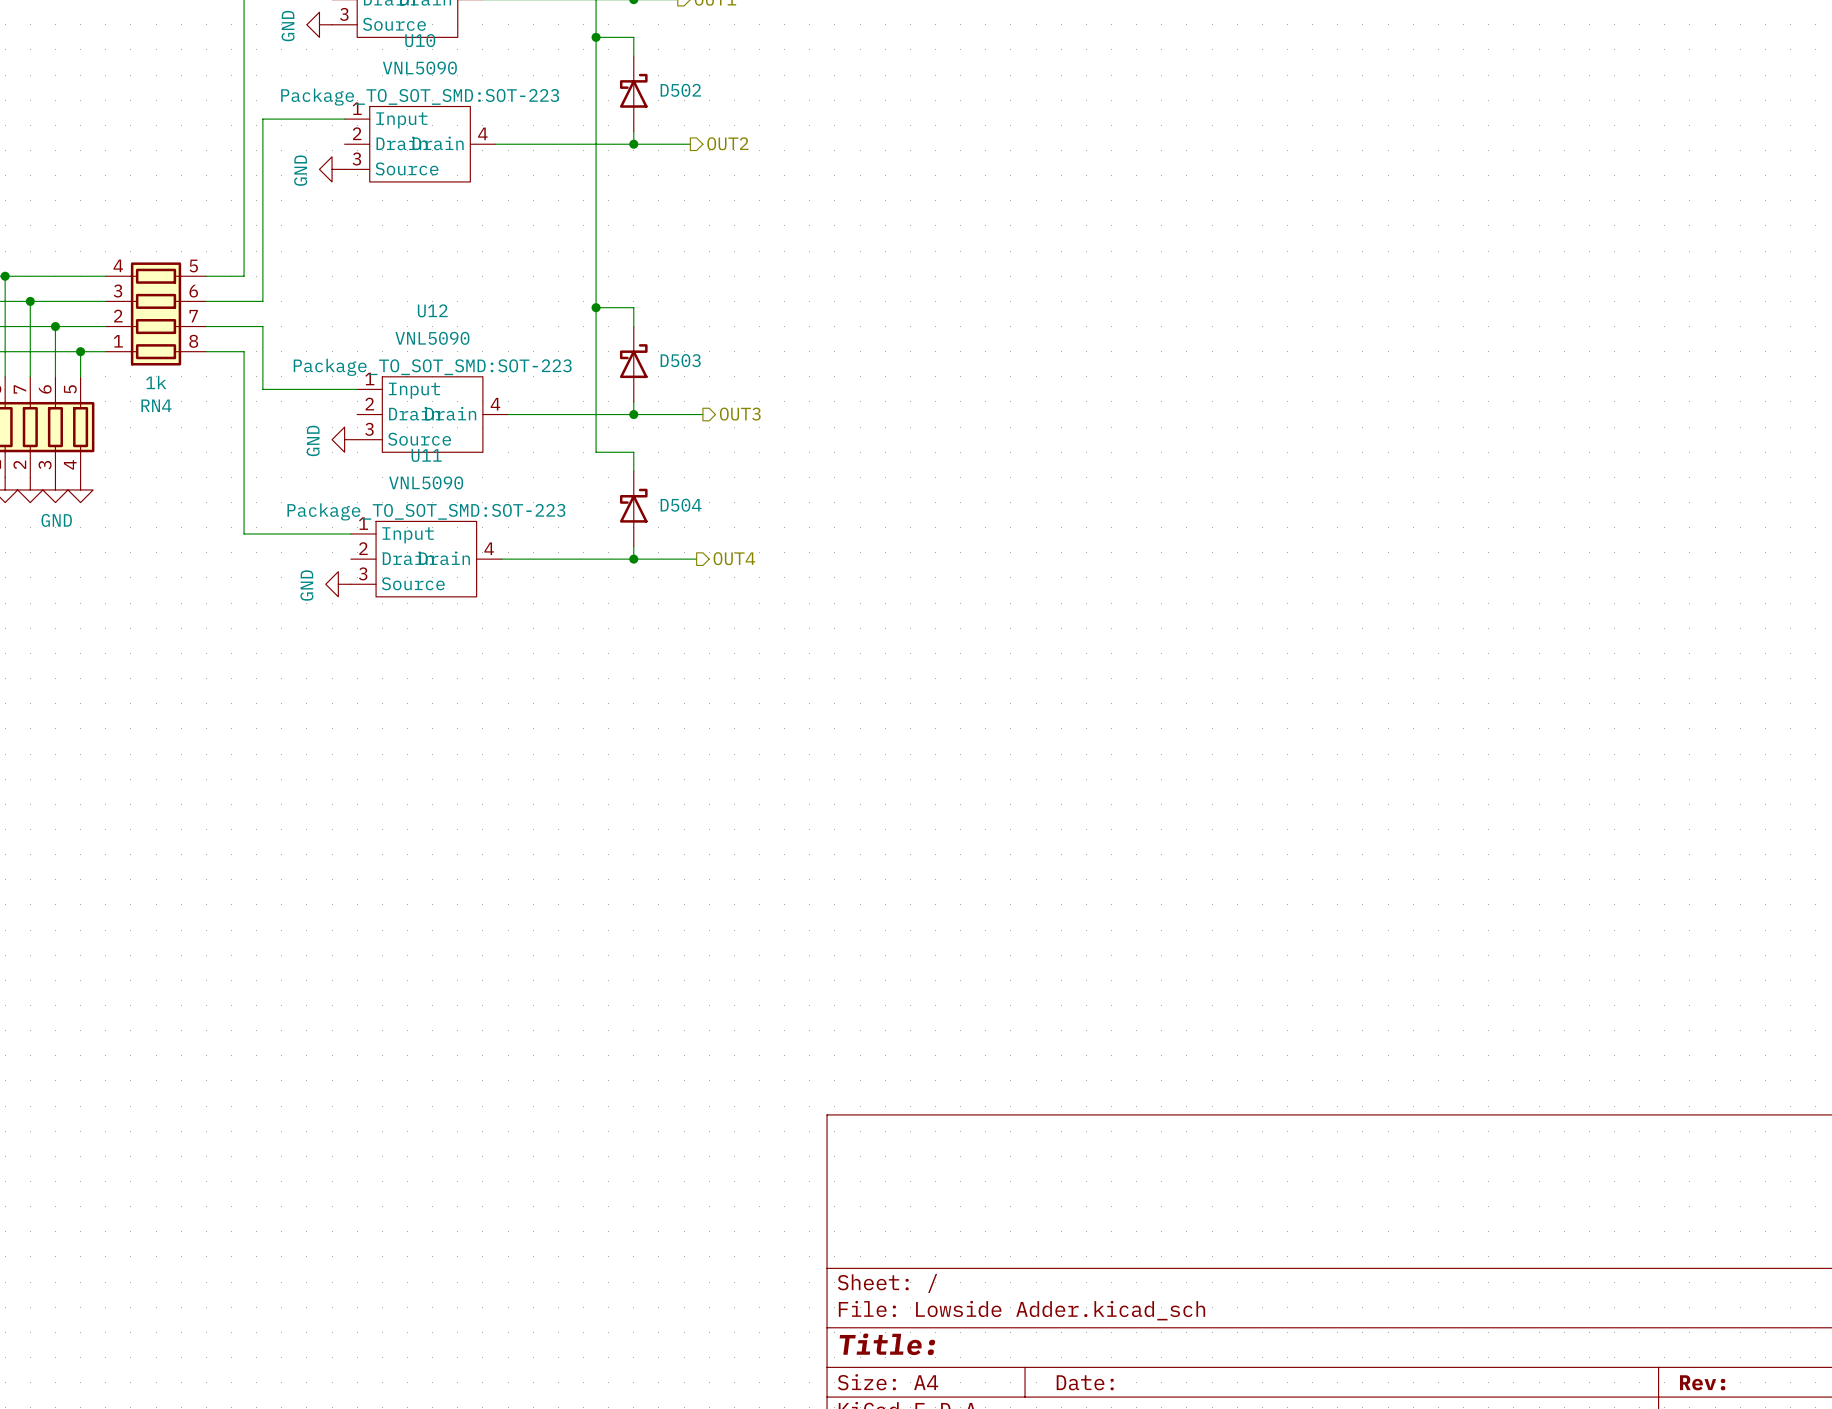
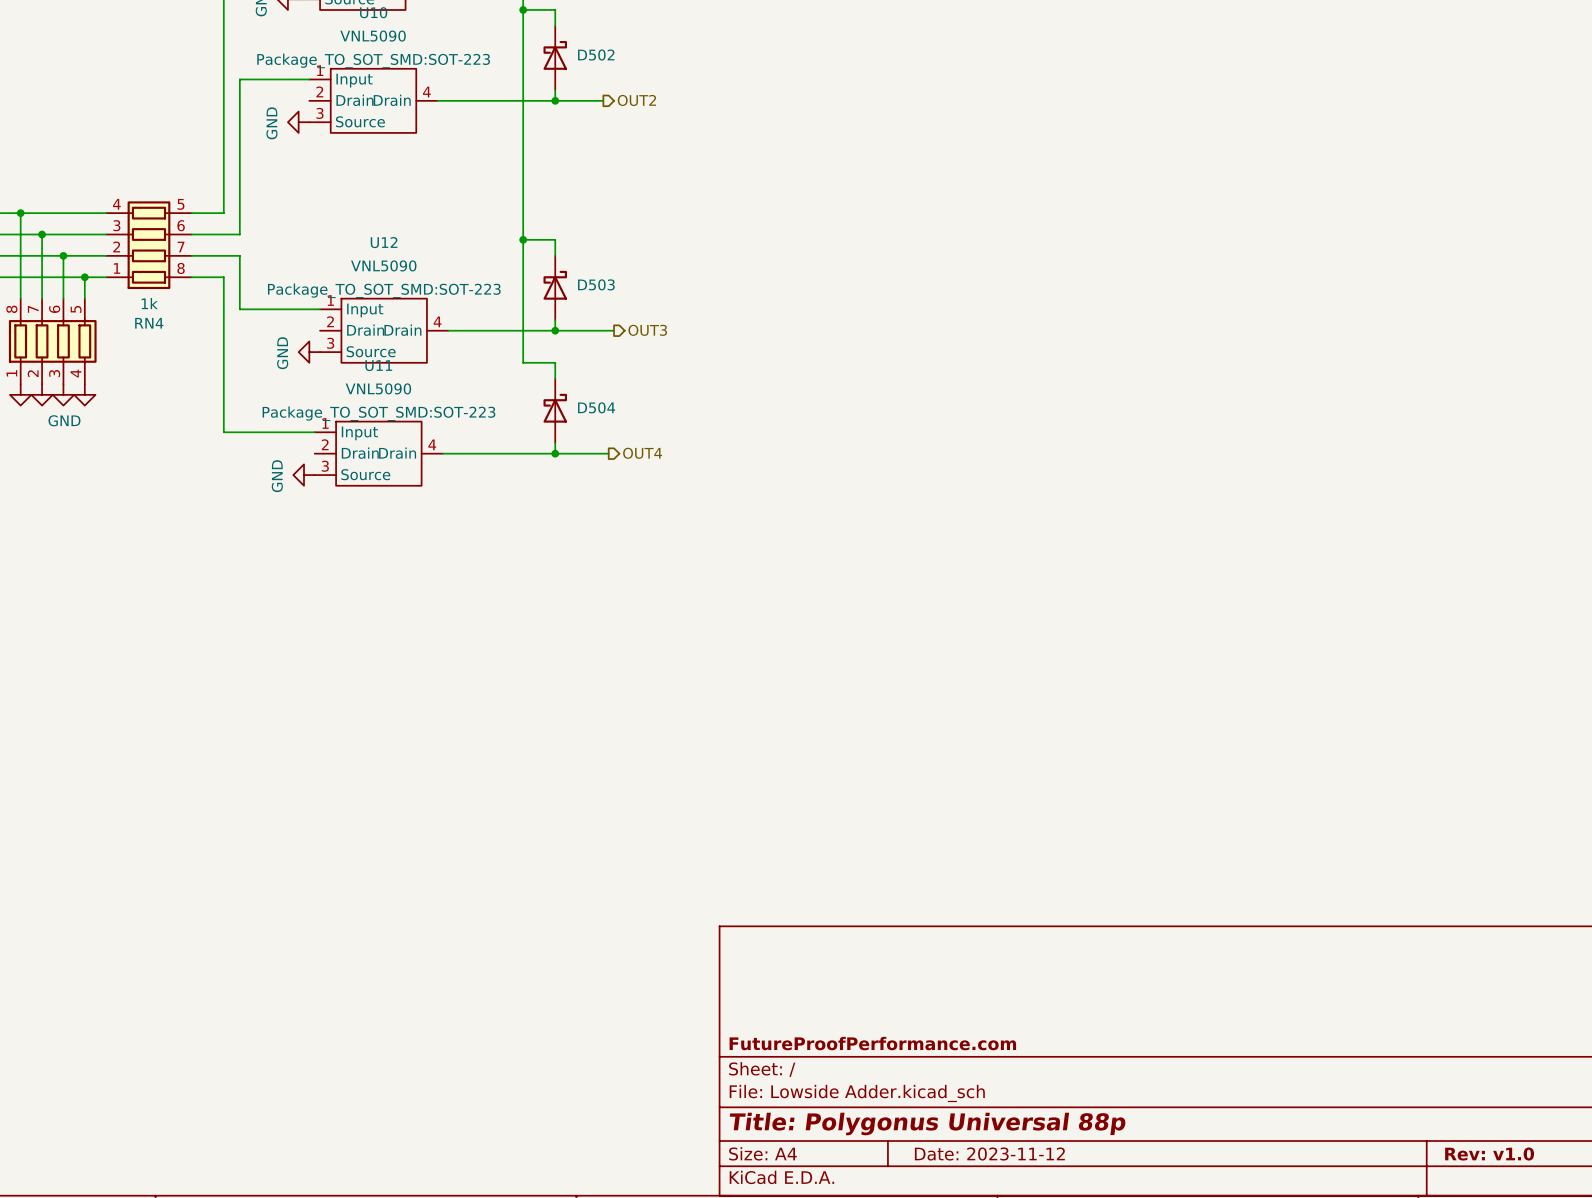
title block: none -> FutureProofPerformance.com (872, 1043)
title block: Title: (887, 1344) -> Title: Polygonus Universal 88p (927, 1123)
title block: Date: (1085, 1382) -> Date: 2023-11-12 (989, 1154)
title block: Rev: (1702, 1382) -> Rev: v1.0 (1489, 1154)

